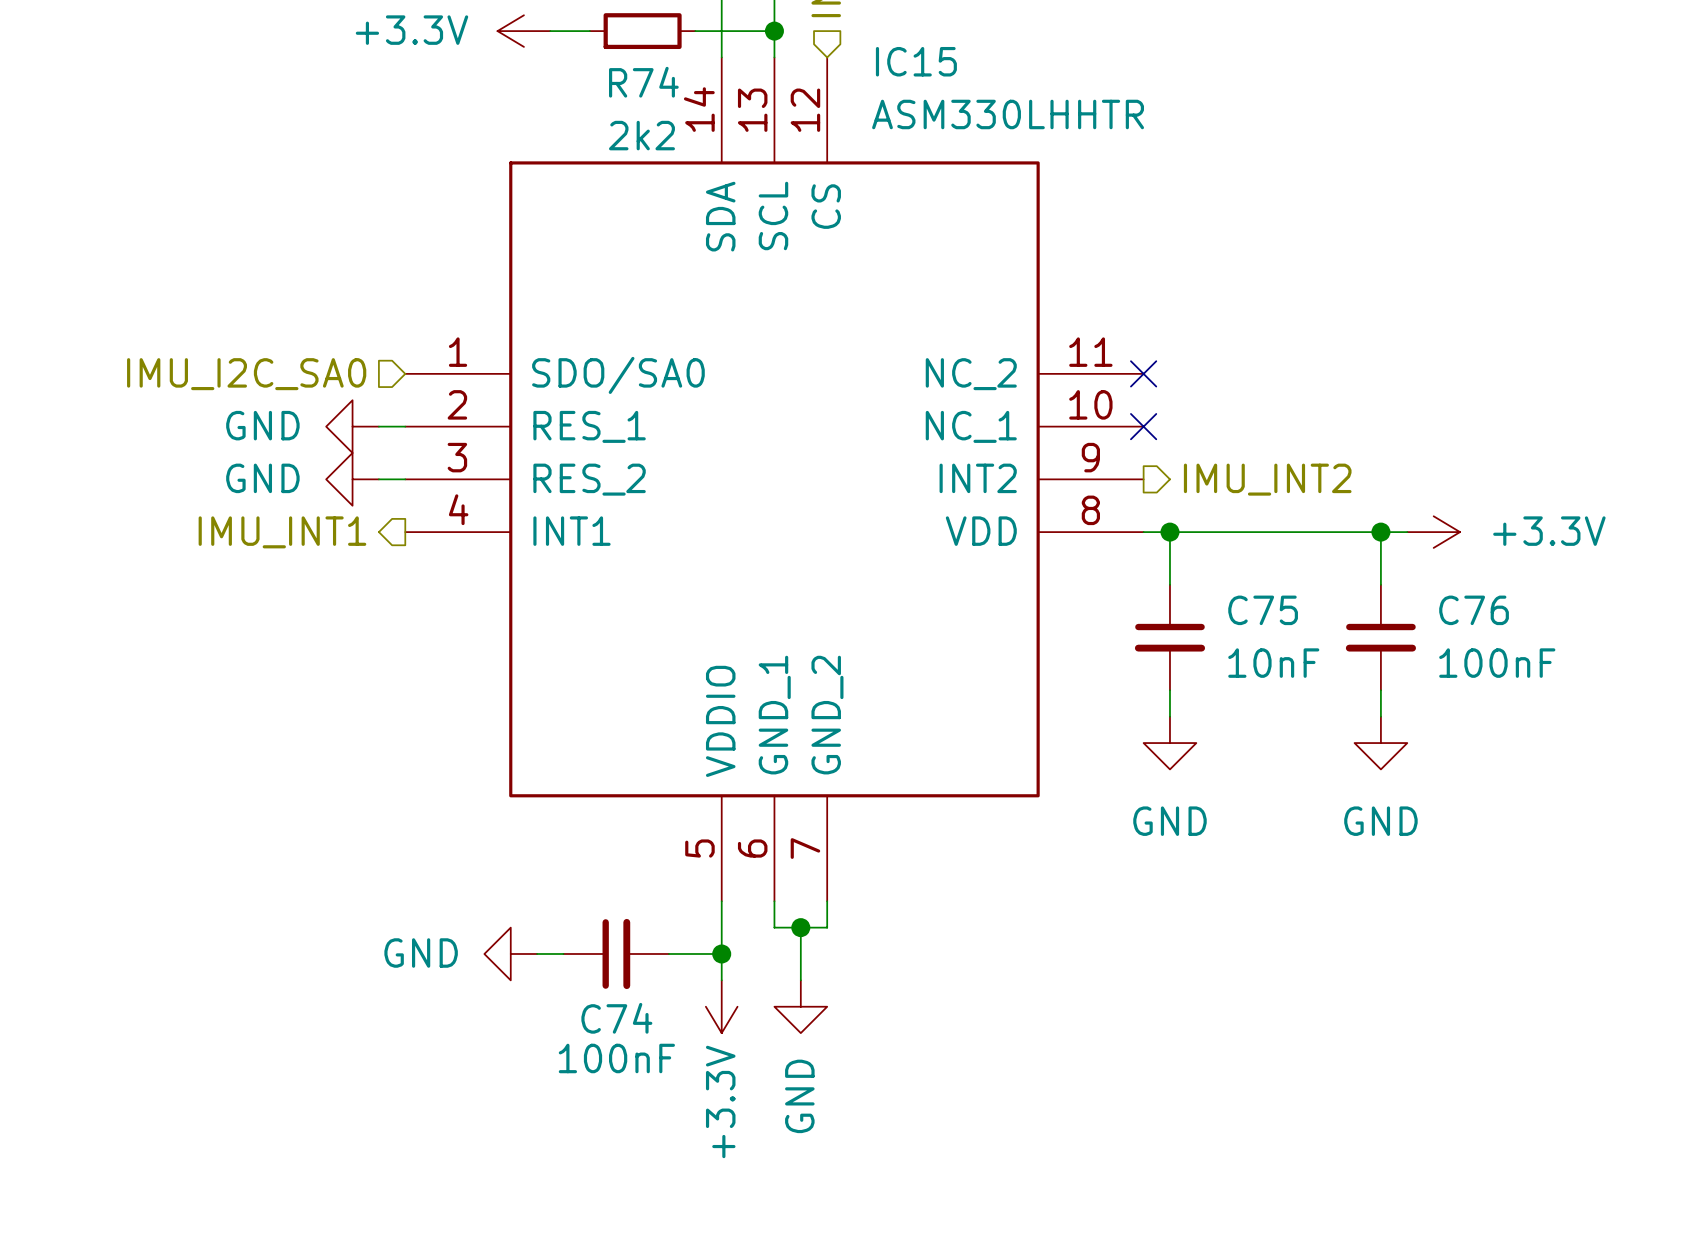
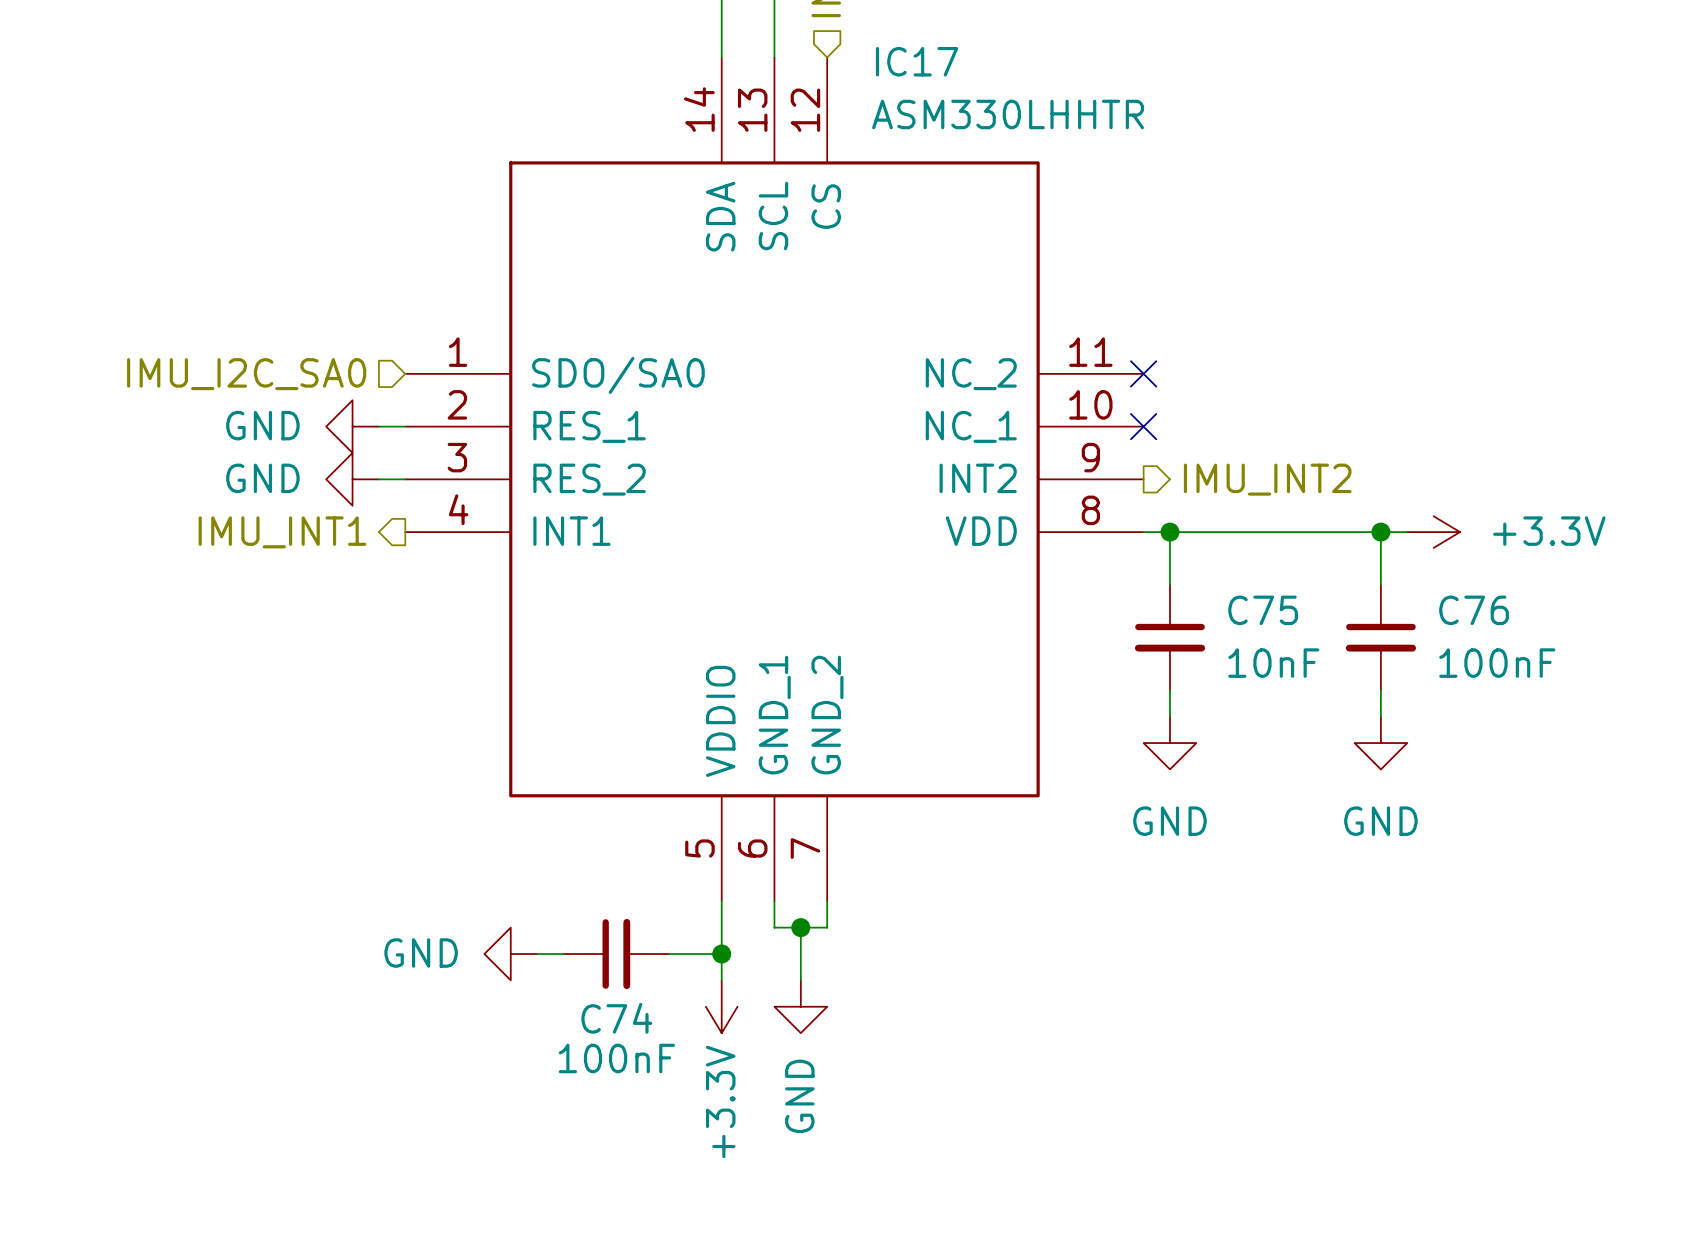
power symbol: +3.3V (523, 31) -> none
wire: (550, 31) (589, 31) -> none
R74: 2k2 (642, 31) -> none
wire: (695, 31) (774, 31) -> none
junction: (774, 31) -> none
IC15 name: IC15 (916, 61) -> IC17 (917, 61)

